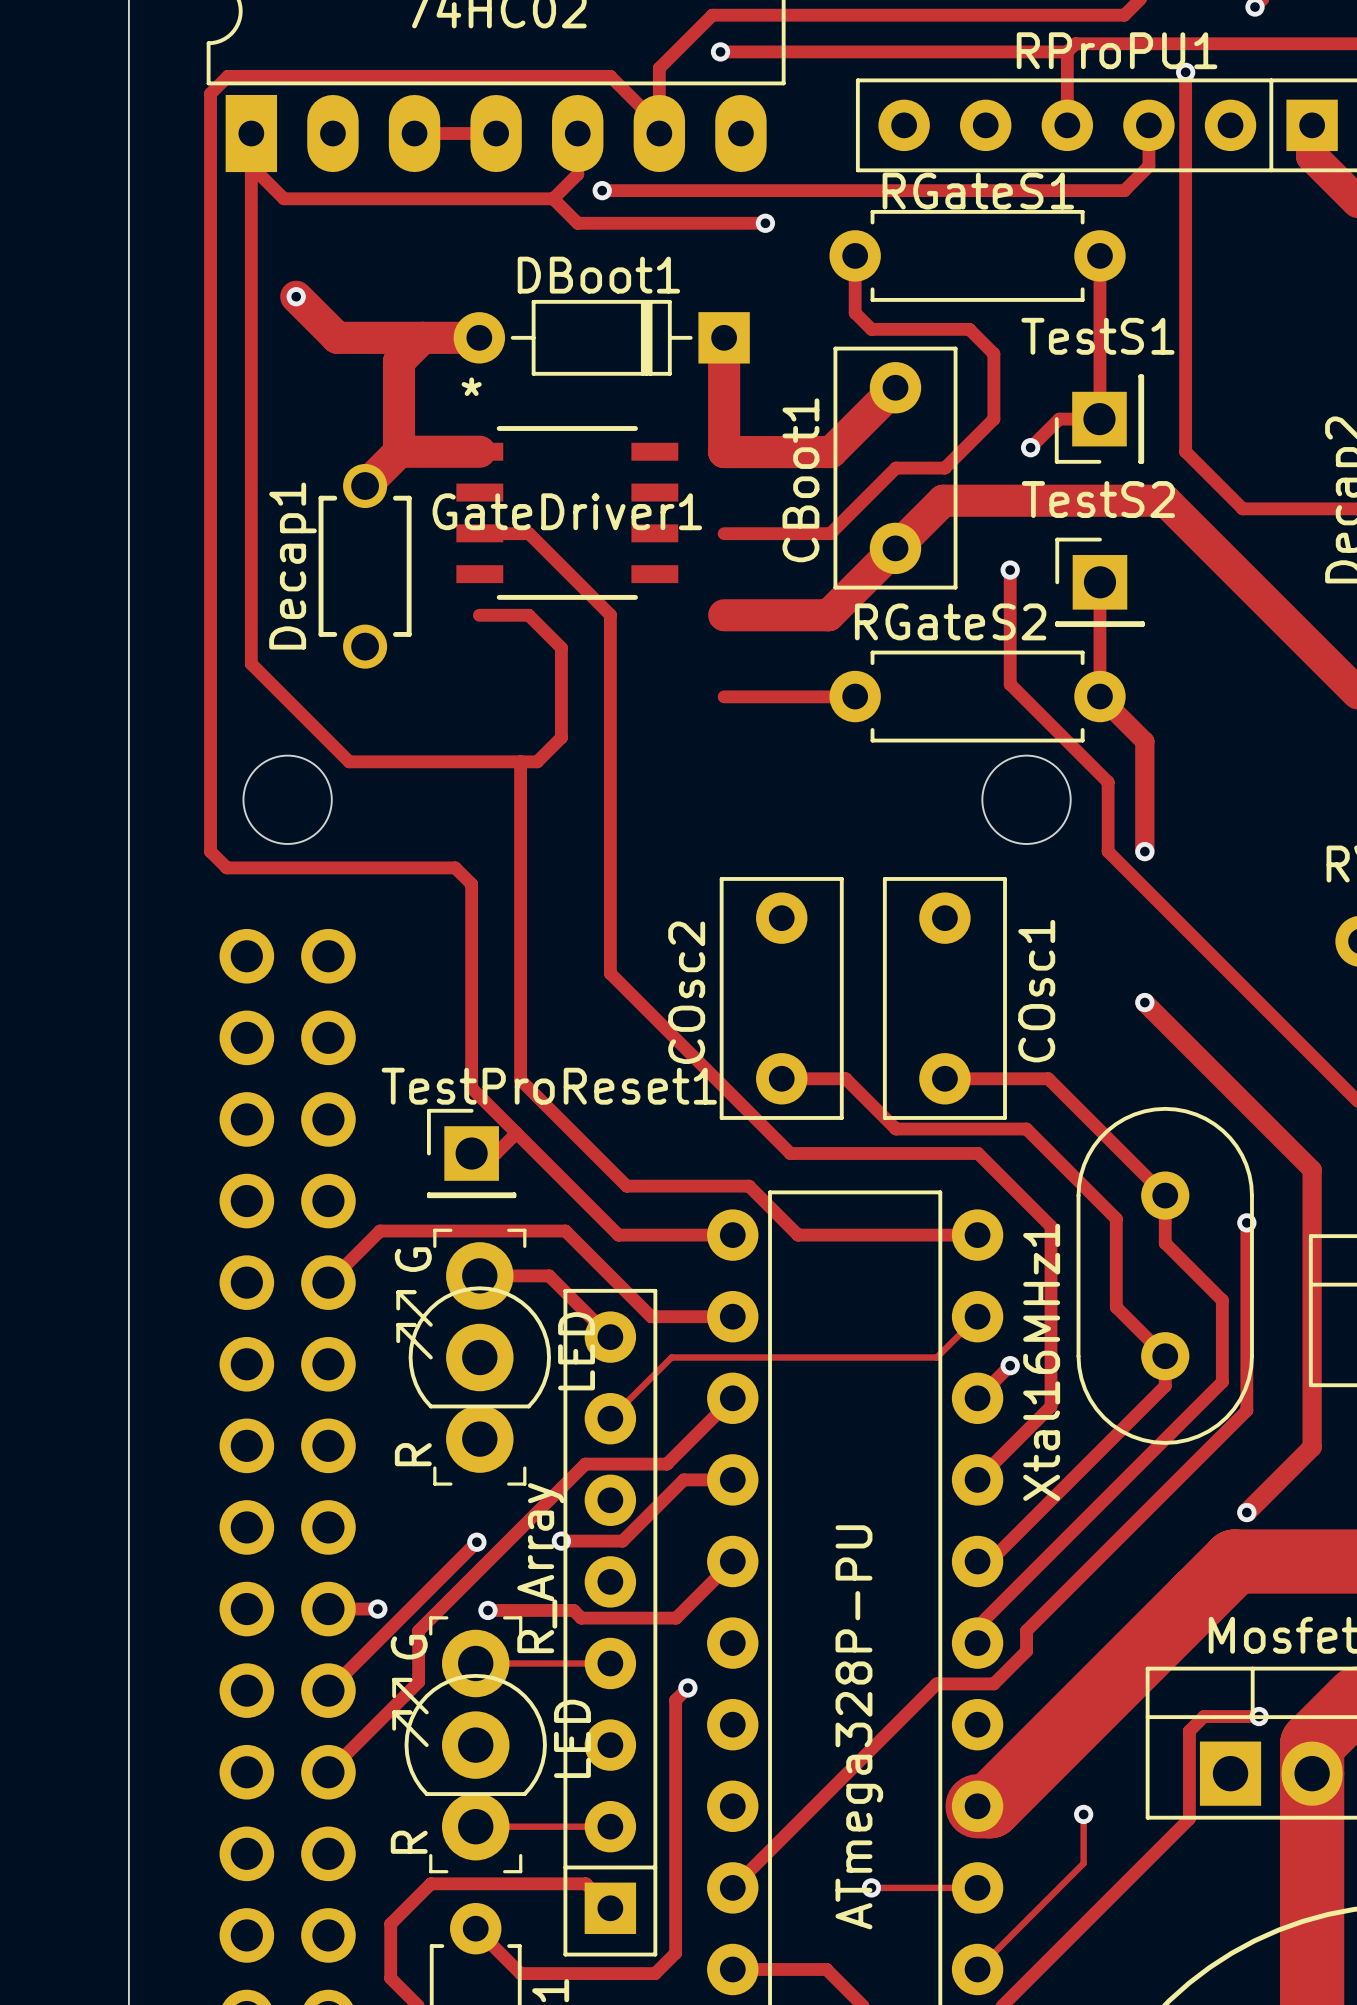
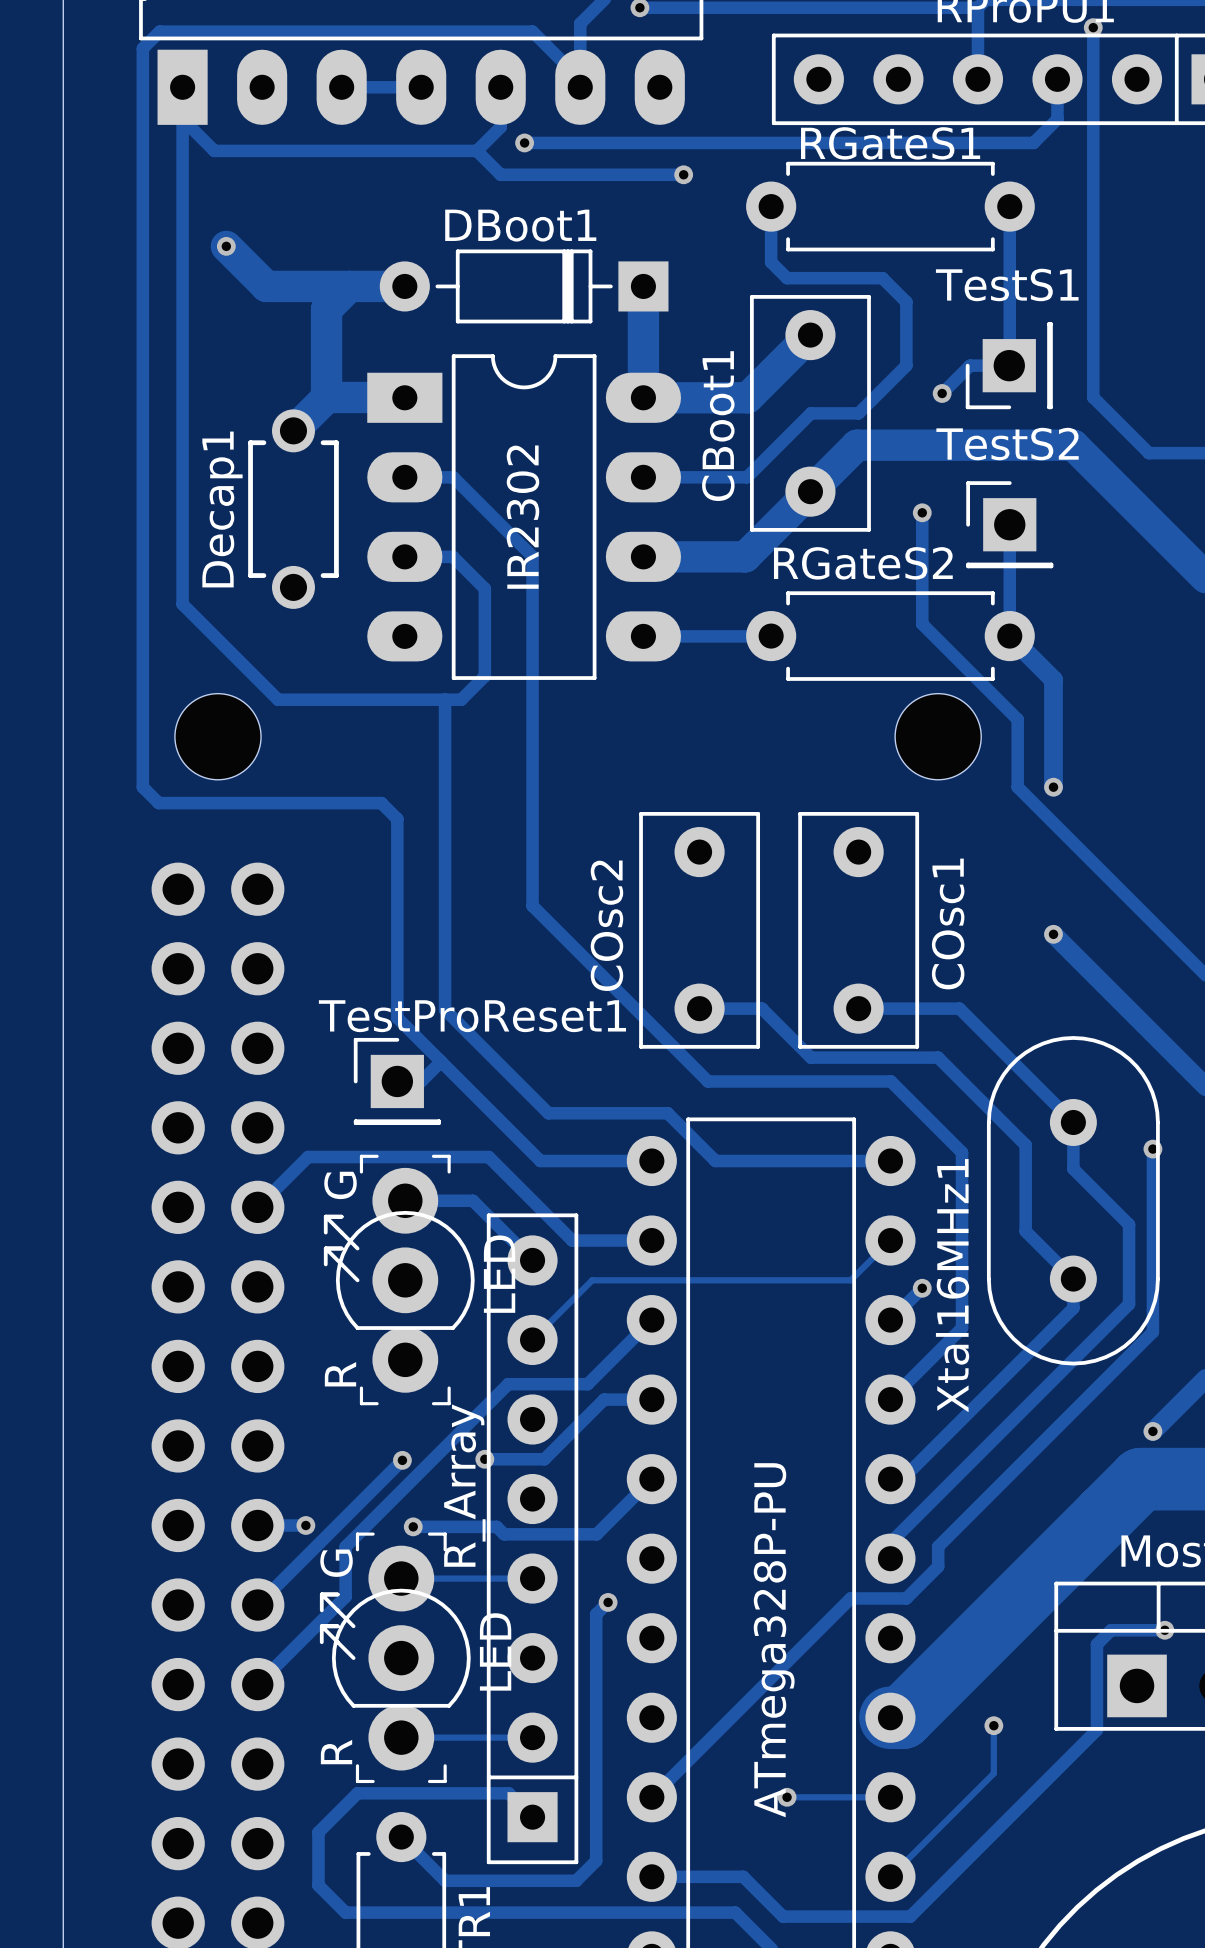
GateDriver1: (567, 512) -> none
part: none -> IR2302 (524, 517)

